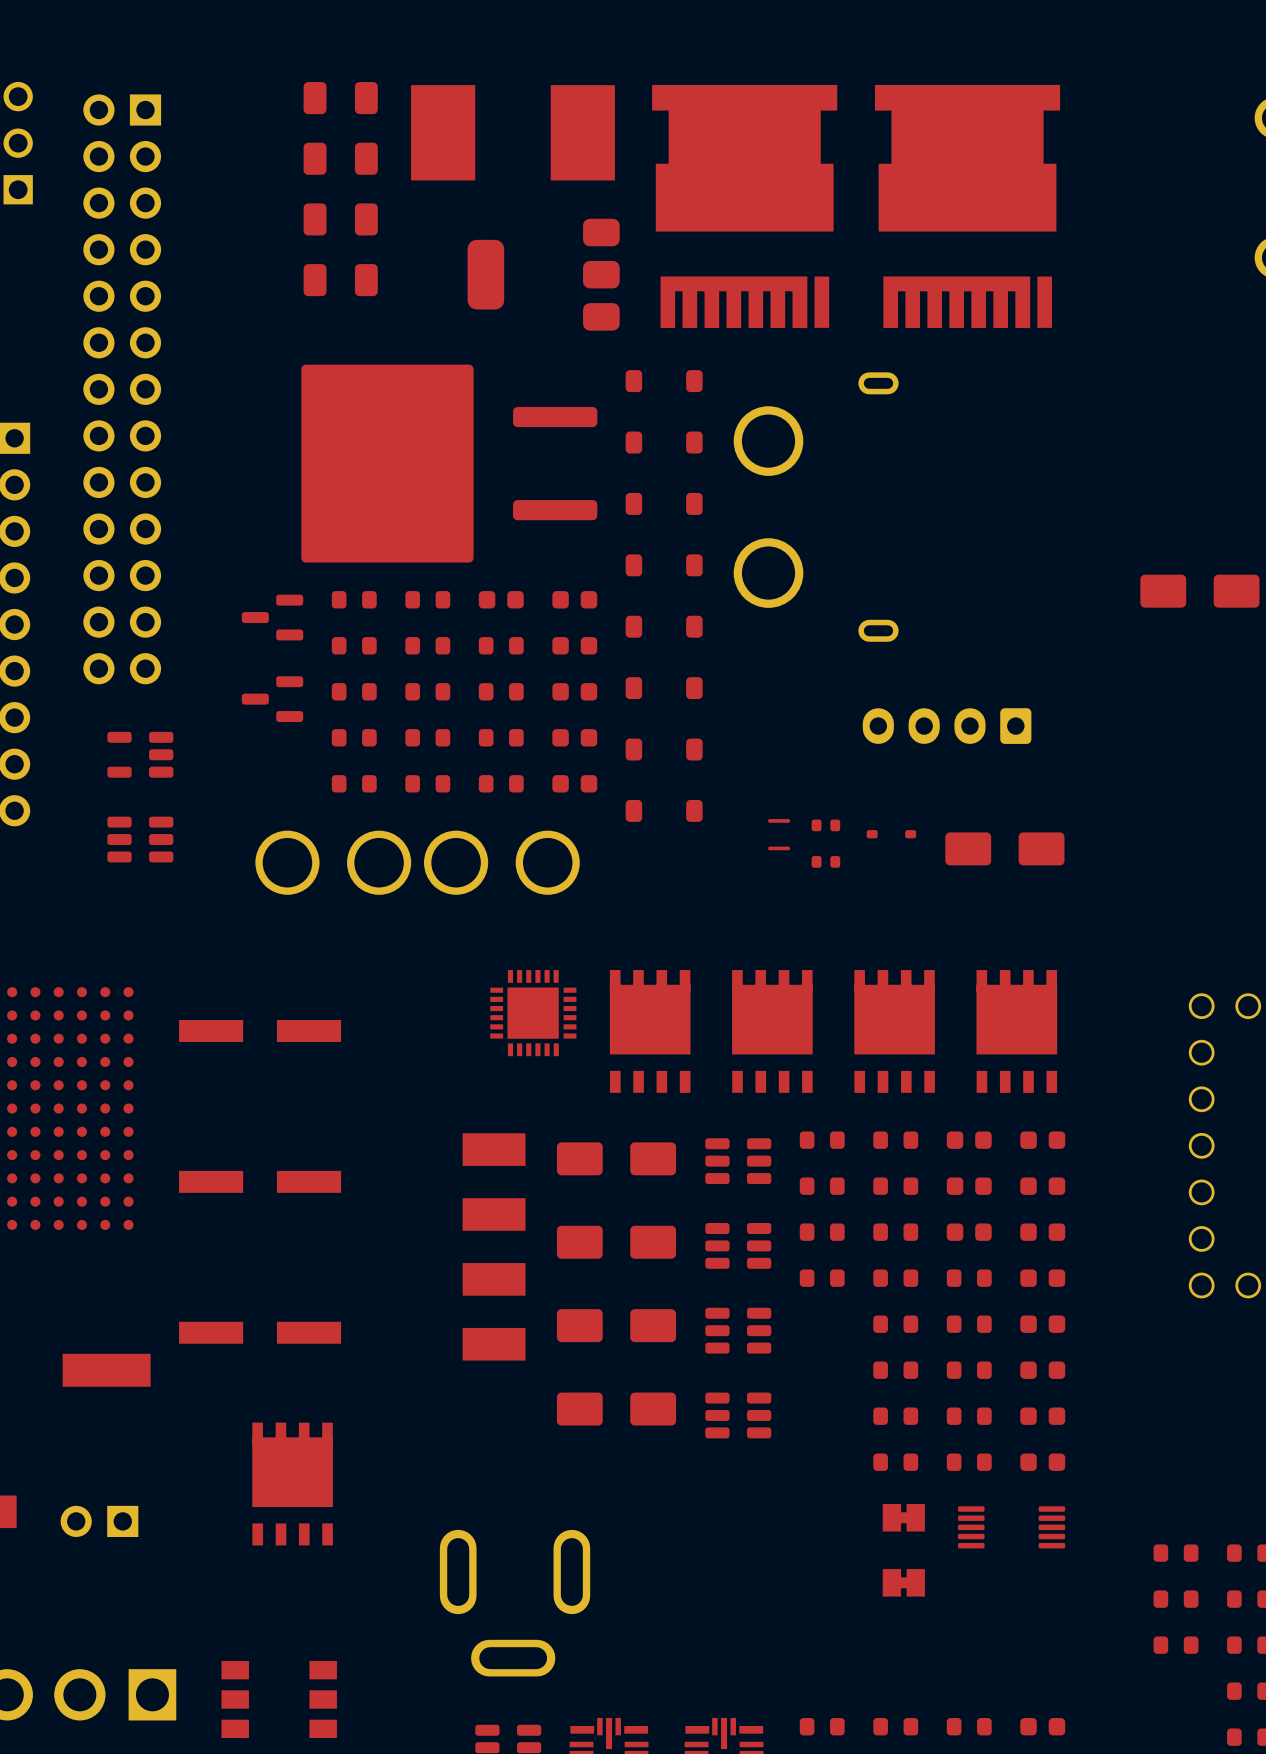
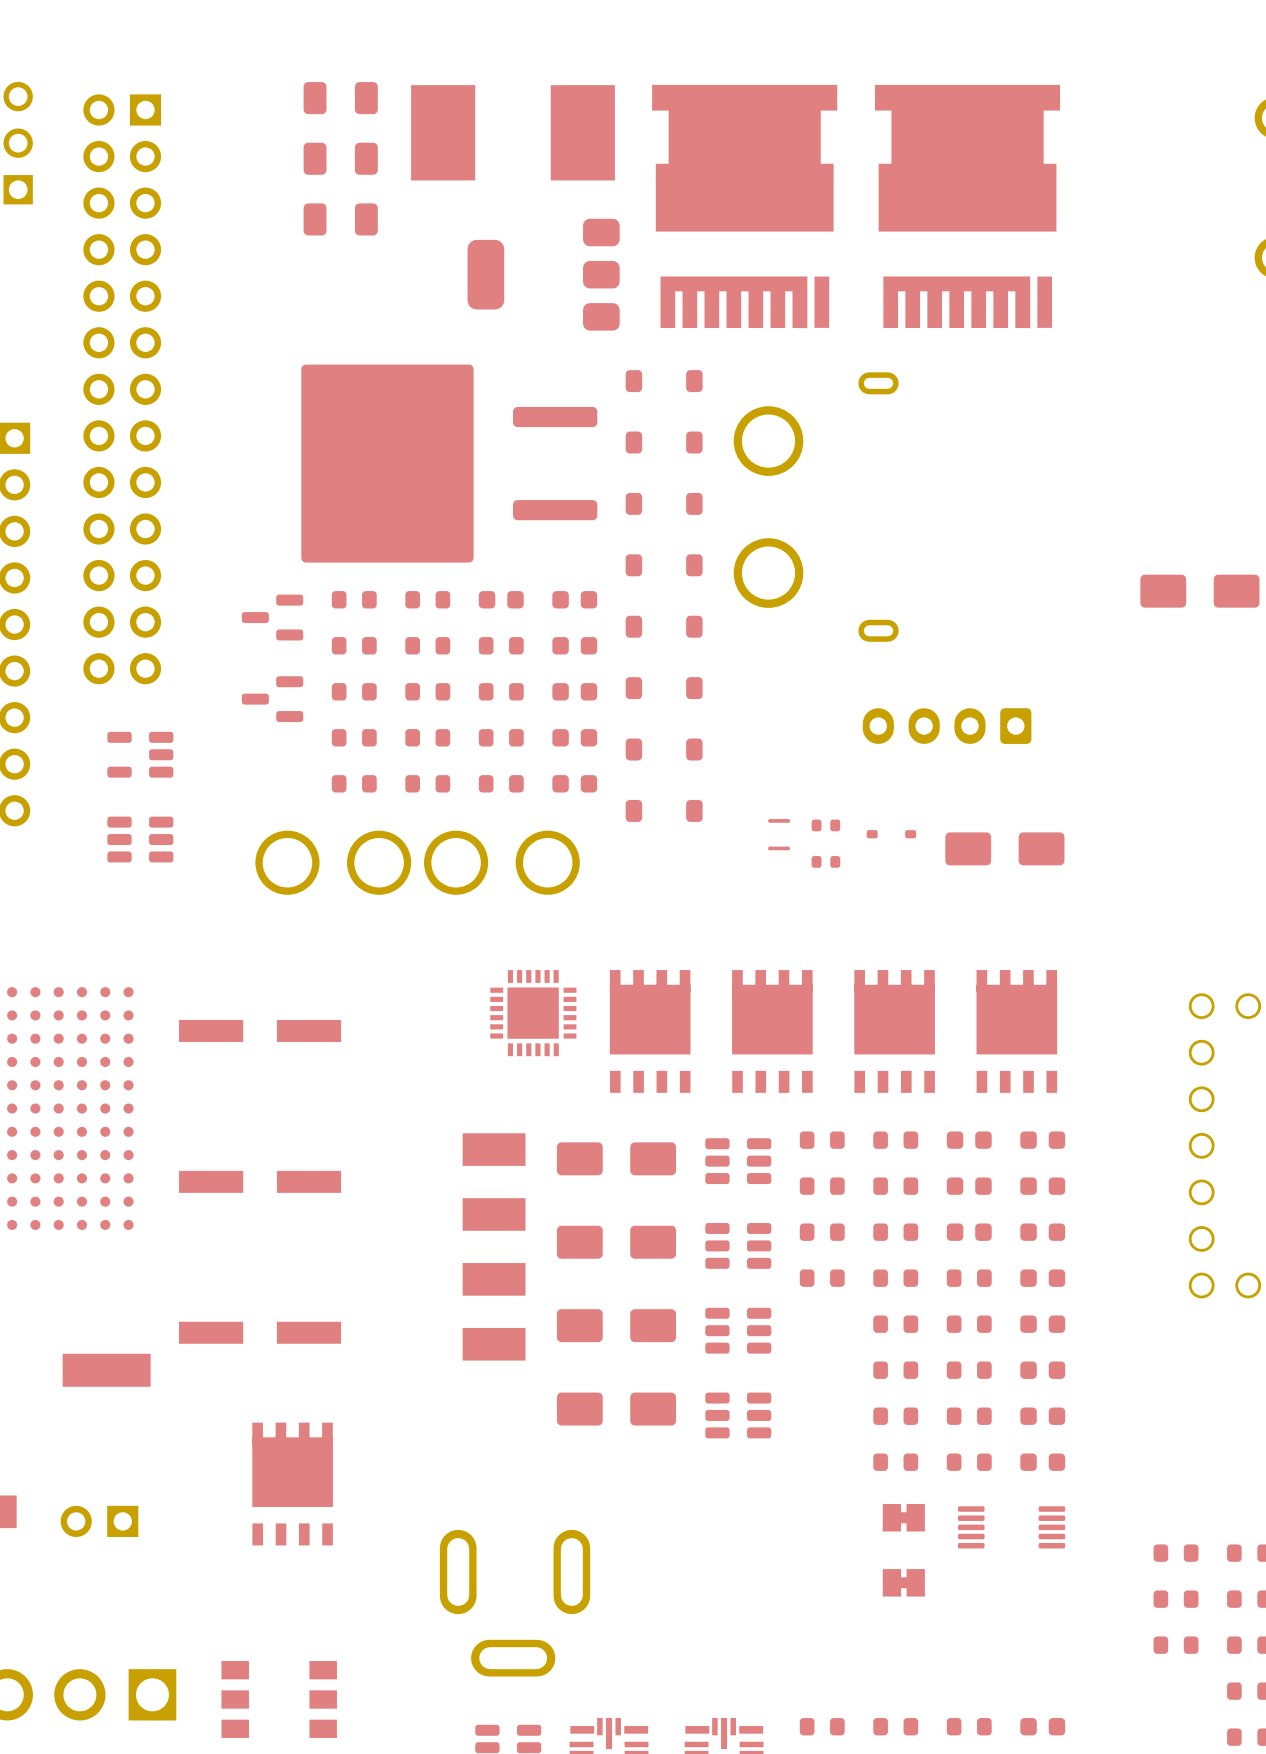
part: (340, 280) -> none

